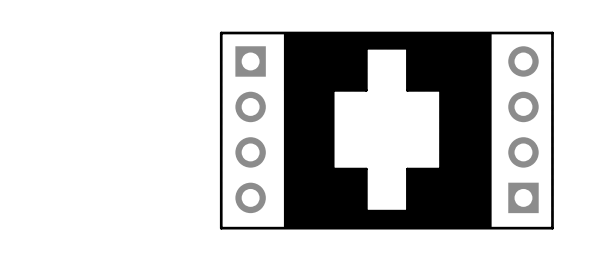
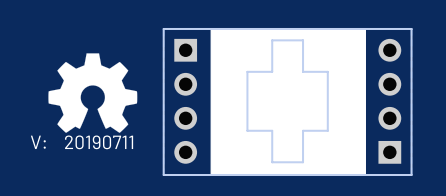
drawing shape: [283, 33, 492, 229] -> [210, 28, 366, 175]
drawing: none -> [48, 53, 138, 133]

